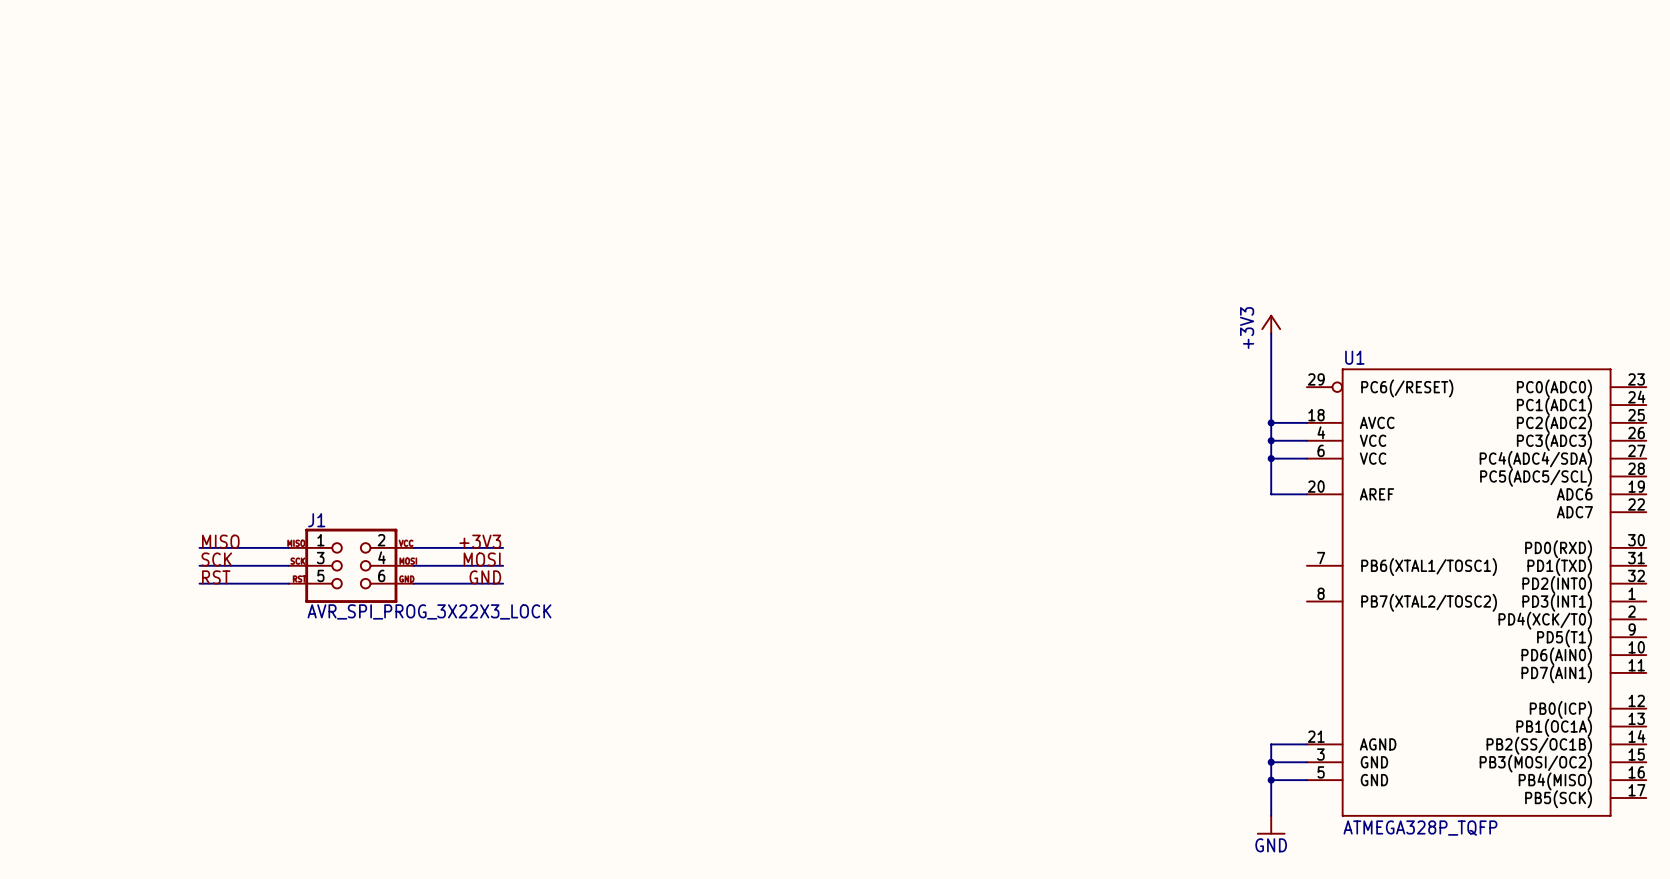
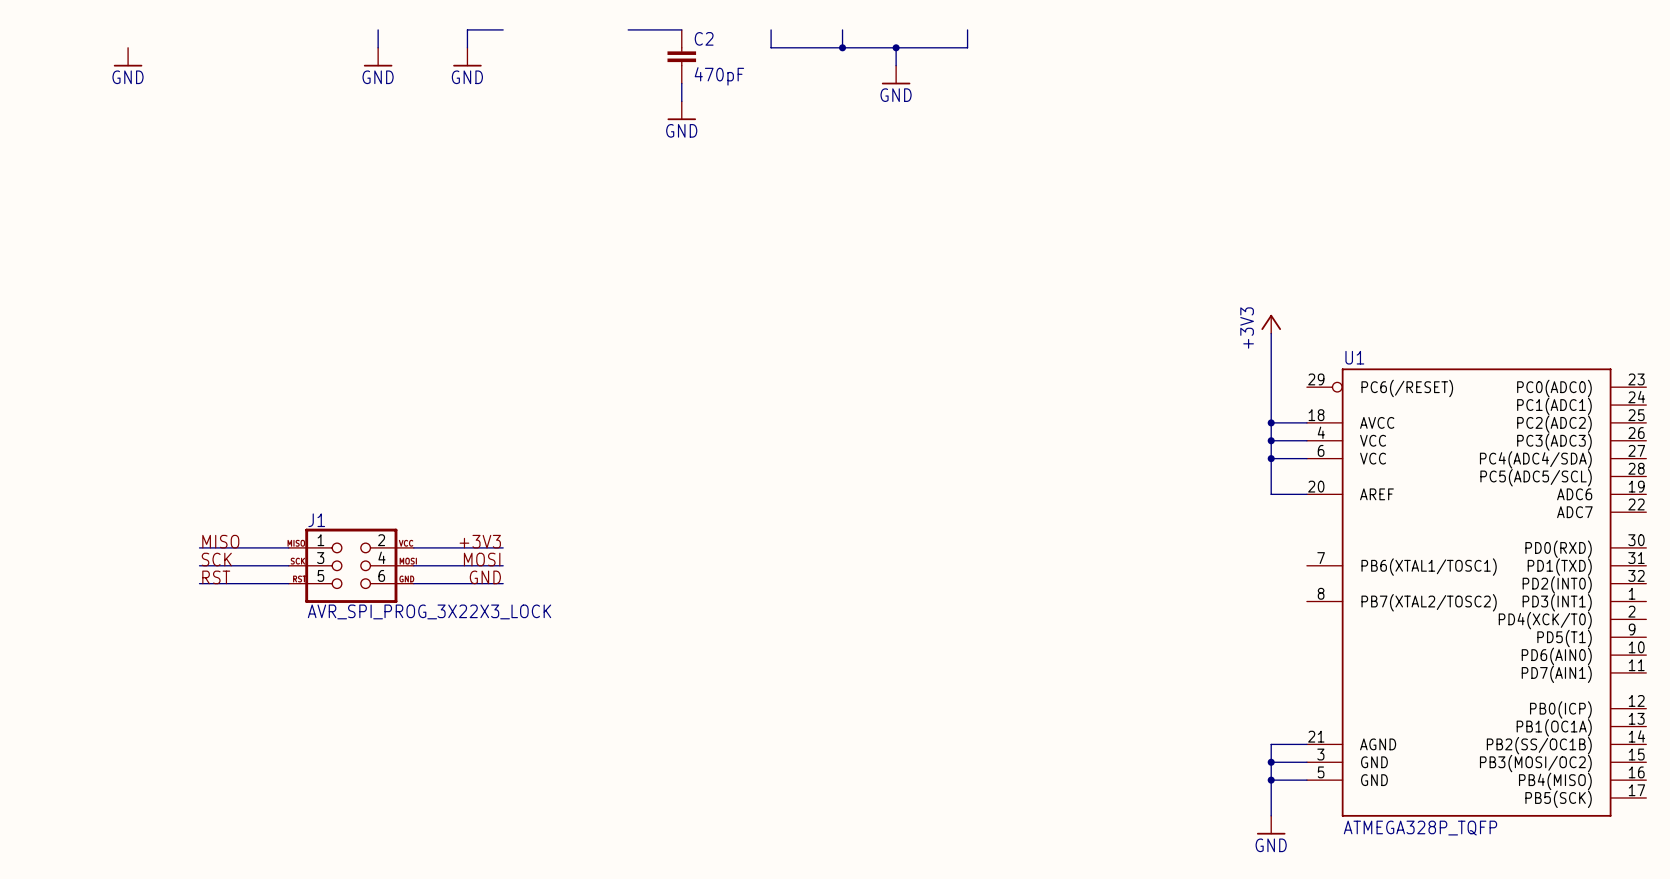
wire: none -> (378, 29) (378, 47)
wire: none -> (503, 29) (467, 29) (467, 47)
wire: none -> (628, 29) (681, 29)
wire: none -> (771, 29) (771, 47) (967, 47) (967, 29)
wire: none -> (842, 29) (842, 47)
junction: none -> (842, 47)
wire: none -> (896, 47) (896, 65)
junction: none -> (896, 47)
C2: none -> 470pF (681, 56)
power symbol: none -> GND (128, 57)
power symbol: none -> GND (378, 57)
power symbol: none -> GND (467, 57)
power symbol: none -> GND (896, 75)
wire: none -> (681, 83) (681, 101)
power symbol: none -> GND (681, 110)

